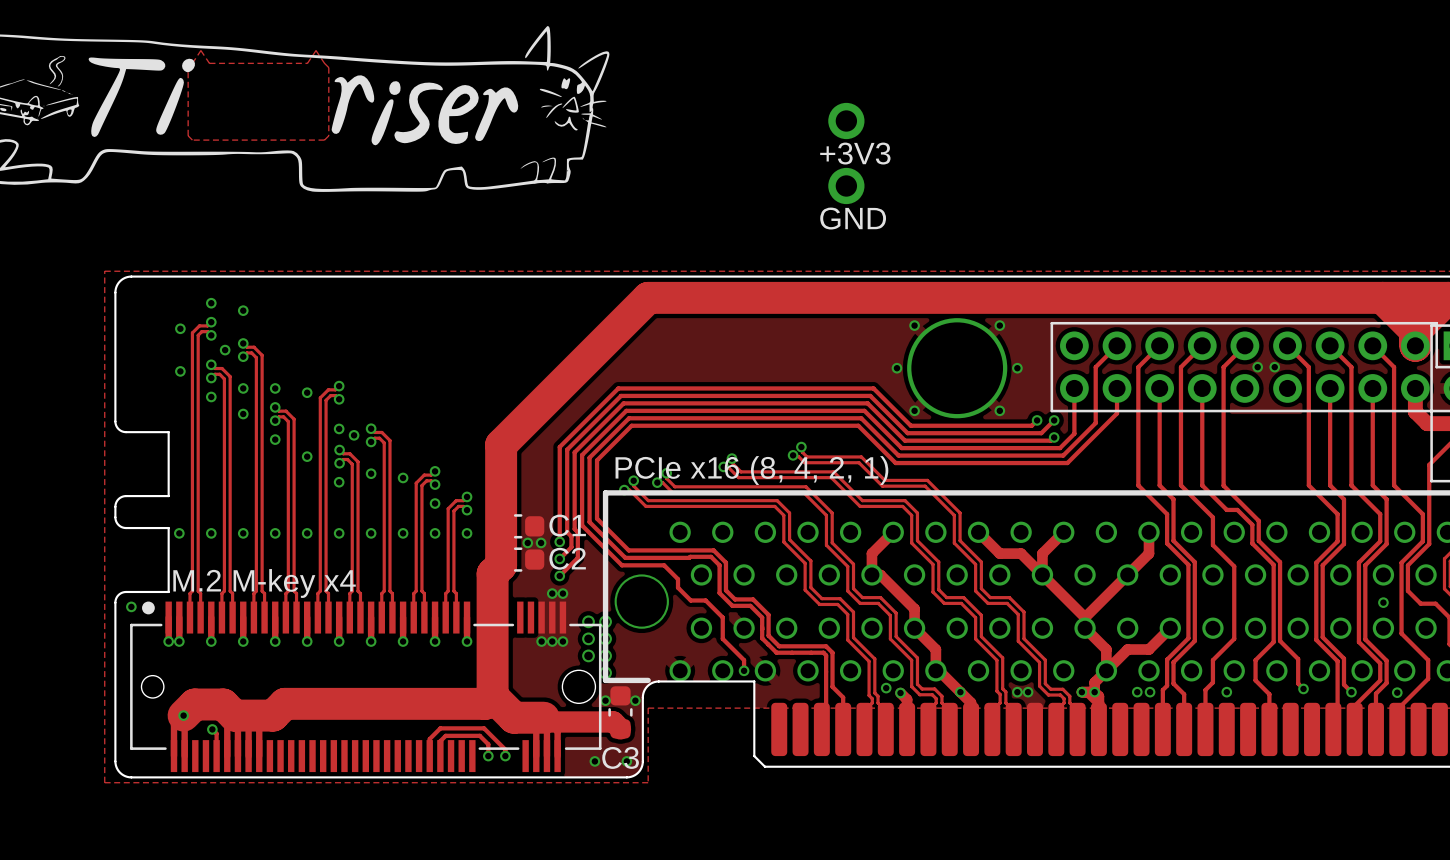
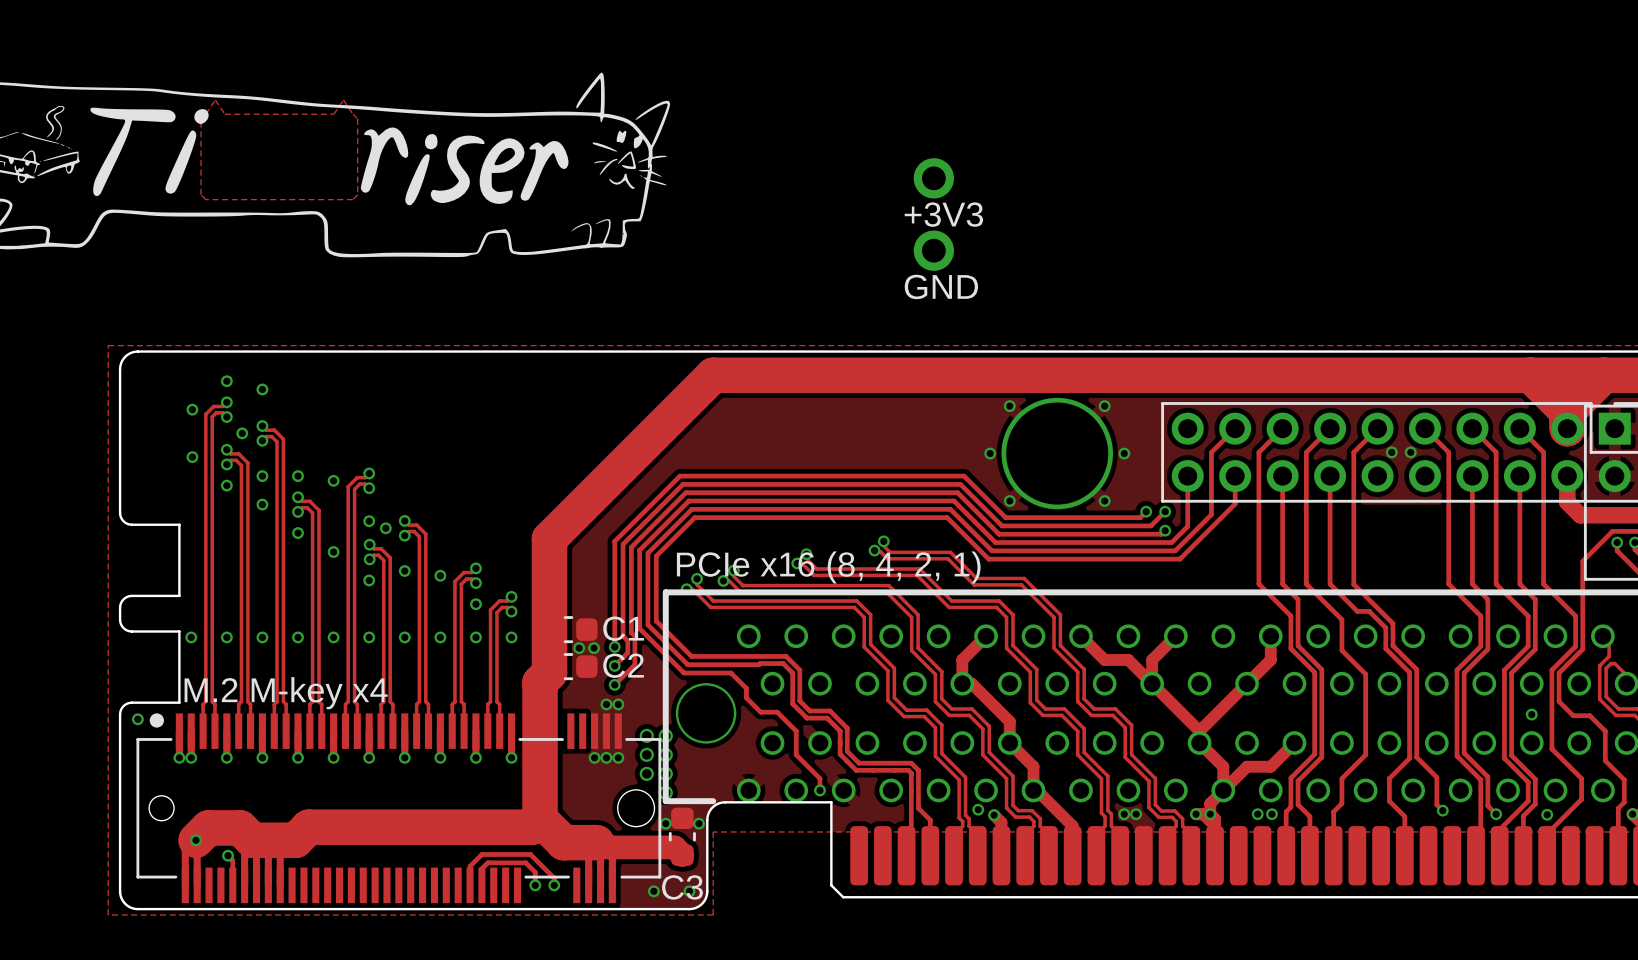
via: (960, 692) -> none
via: (1226, 692) -> none

